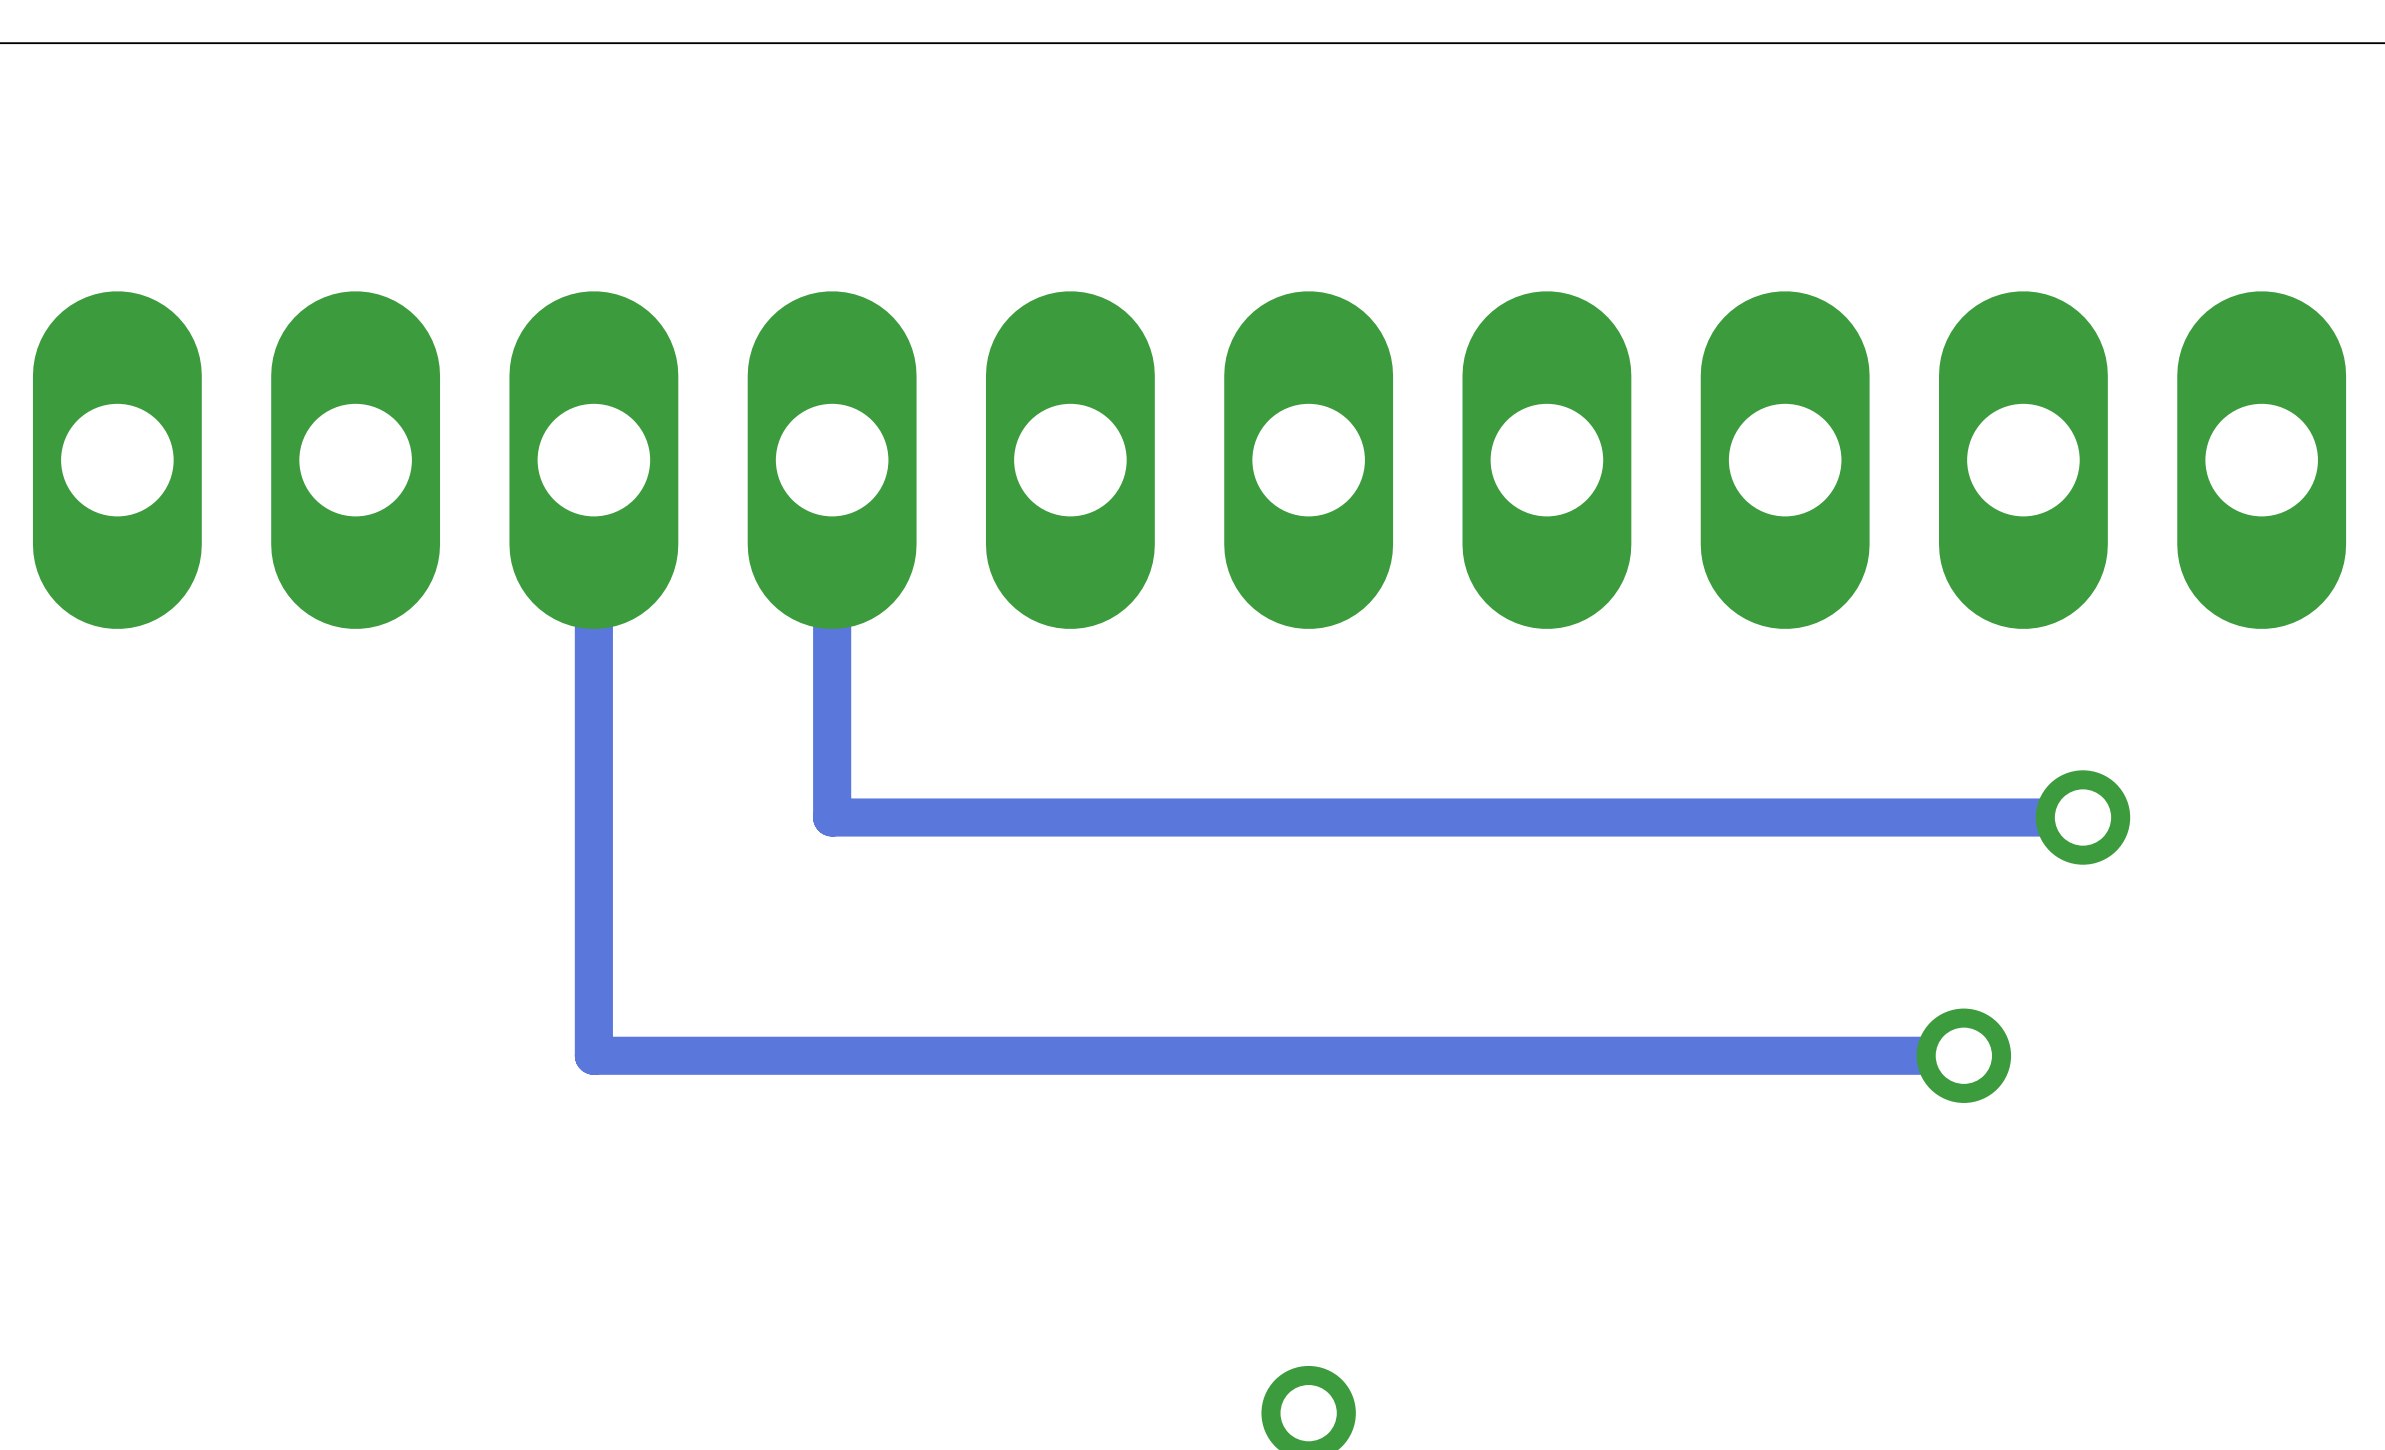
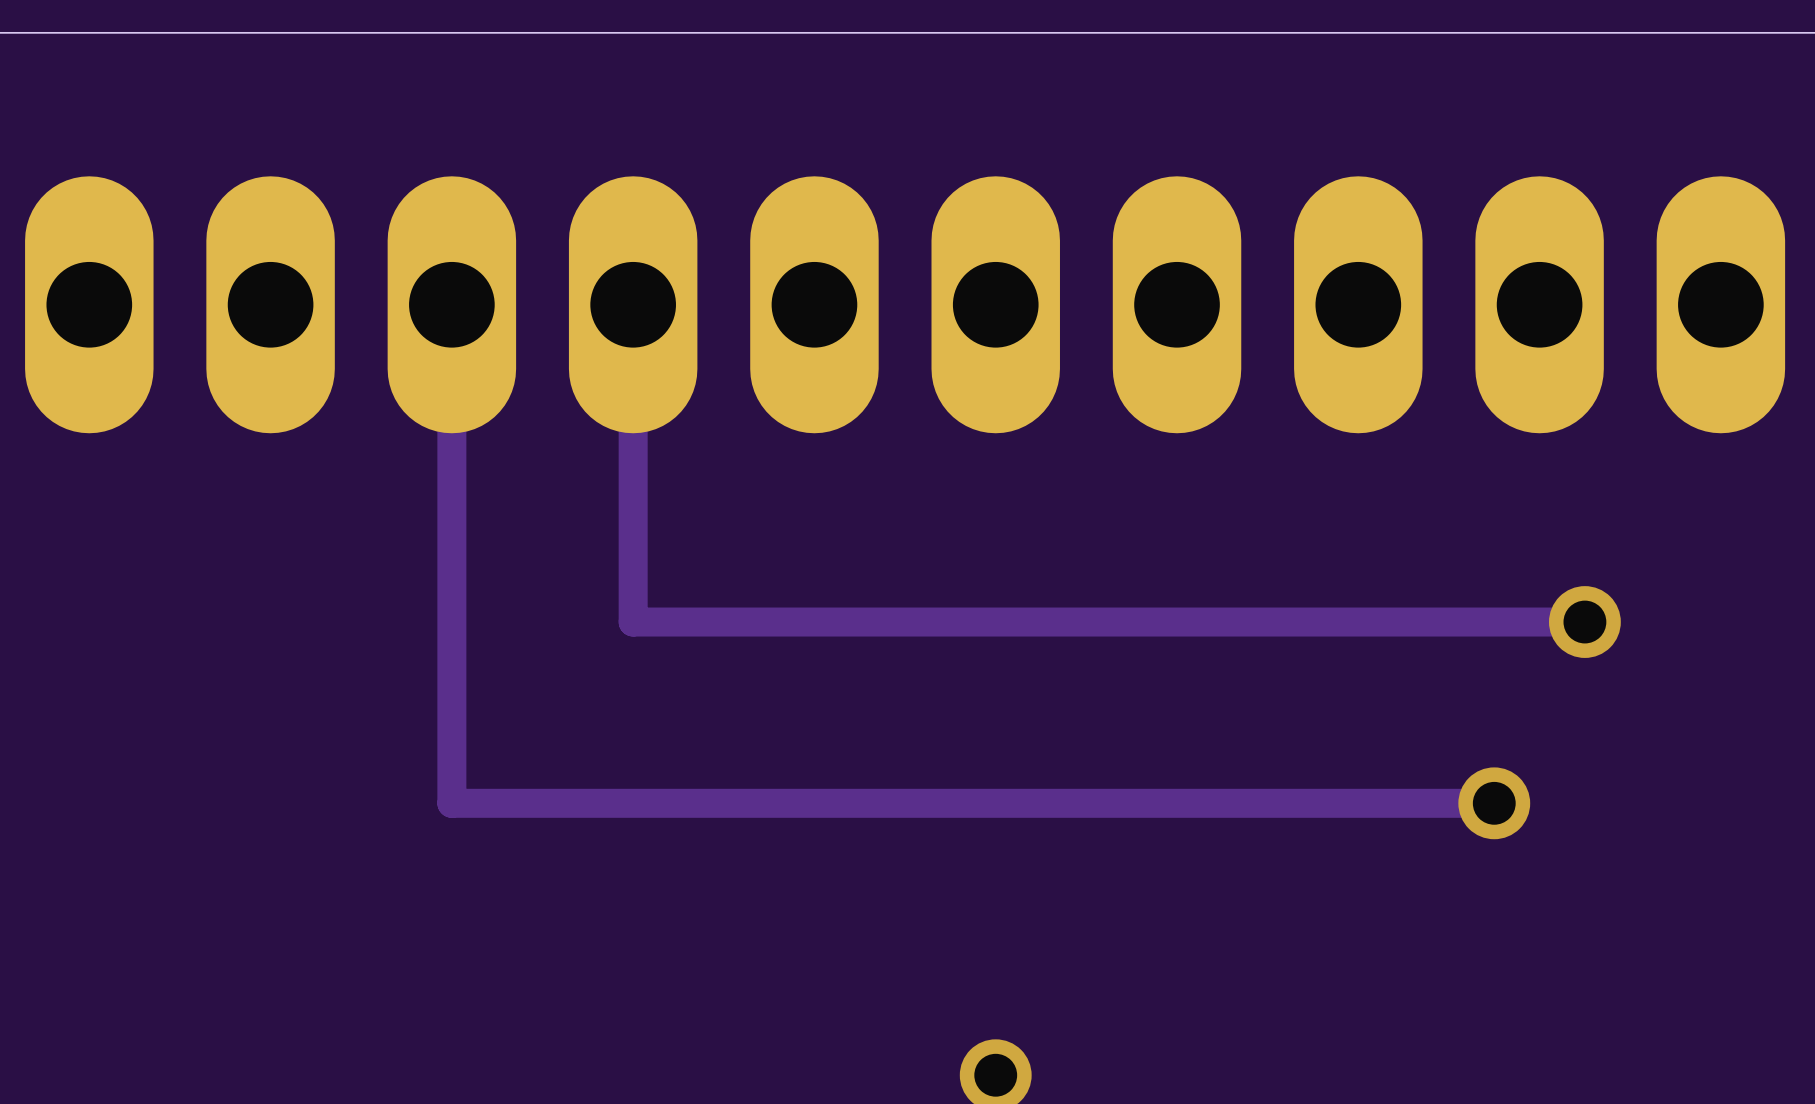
part position: (1189, 460) -> (905, 304)

